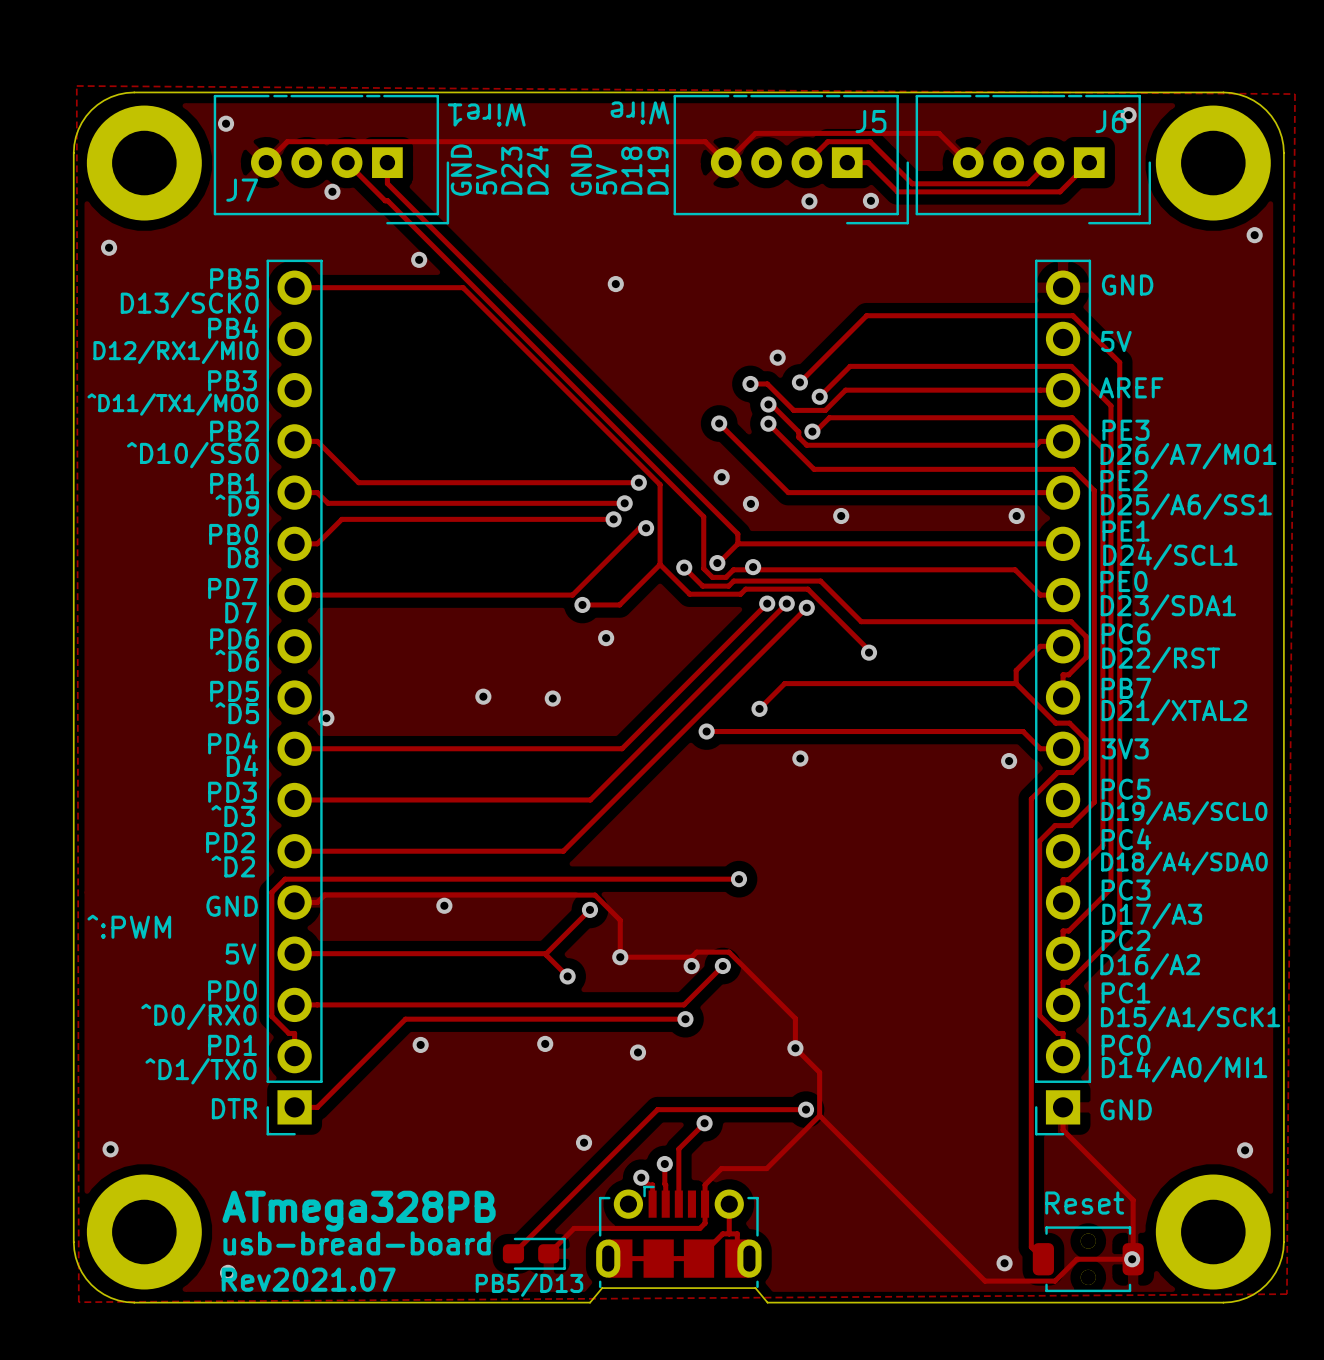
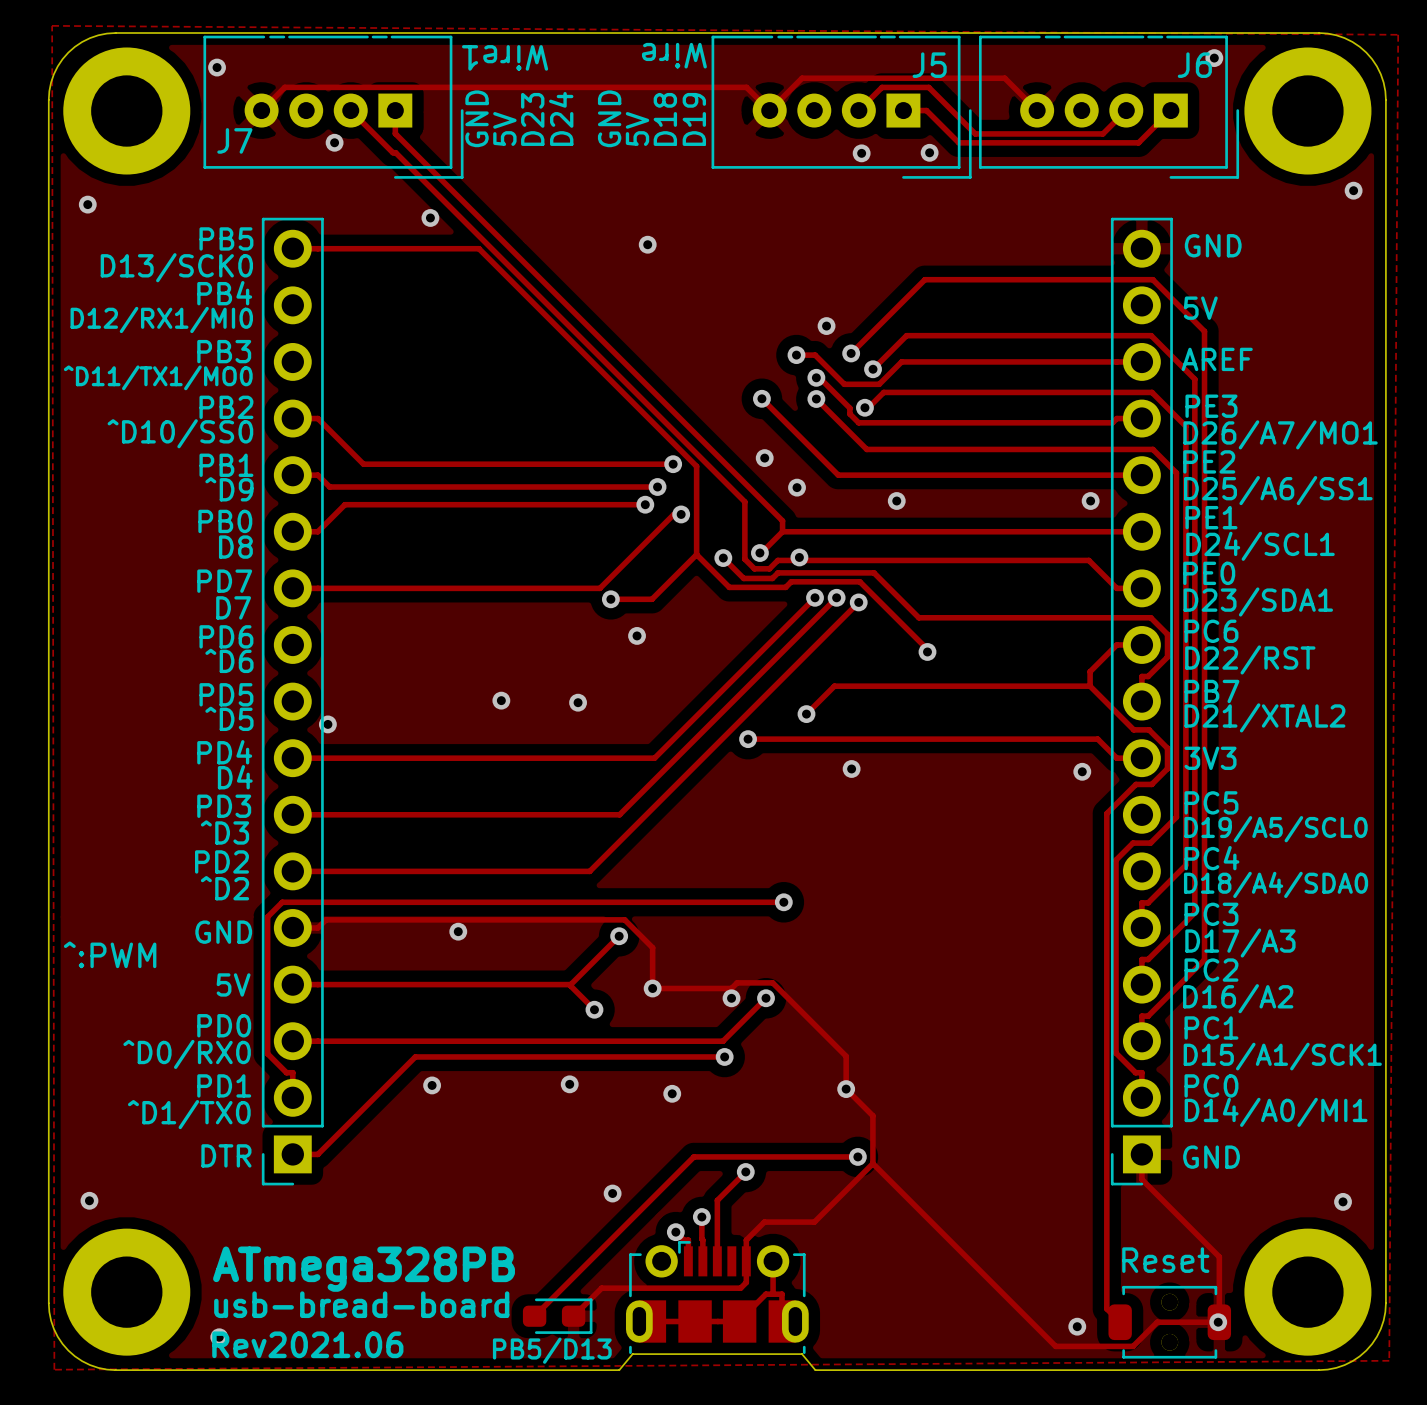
text: Rev2021.07 (308, 1279) -> Rev2021.06 (307, 1344)

